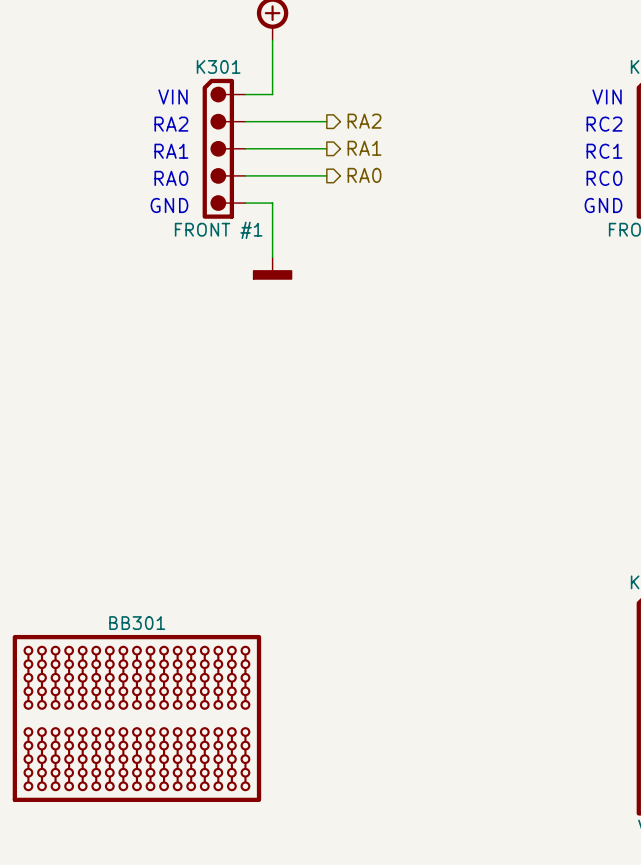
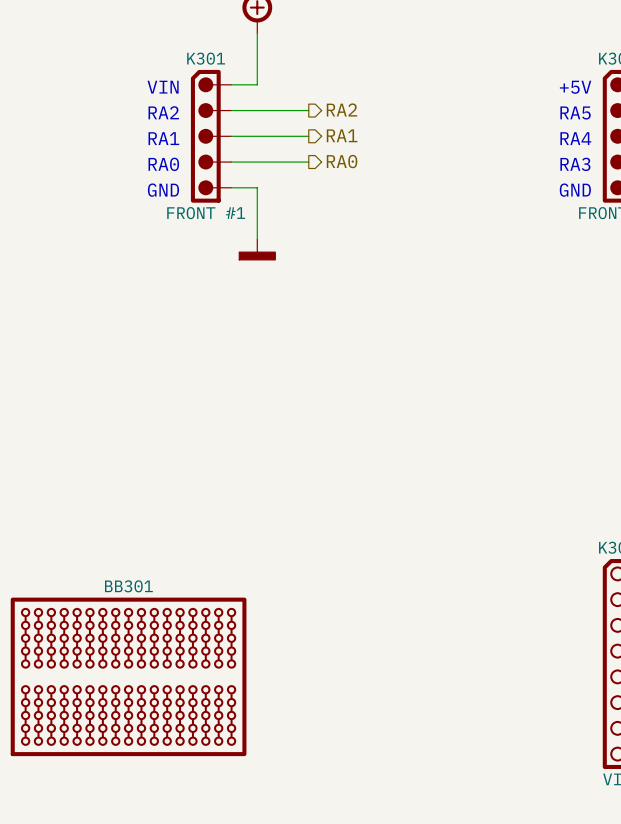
text: VIN (607, 96) -> +5V (575, 87)
text: RC2 (604, 124) -> RA5 (575, 113)
text: RC1 (604, 151) -> RA4 (575, 138)
text: RC0 (604, 178) -> RA3 (575, 164)

